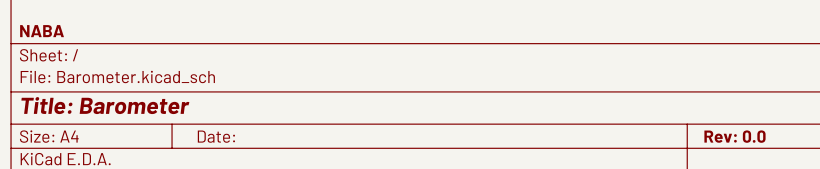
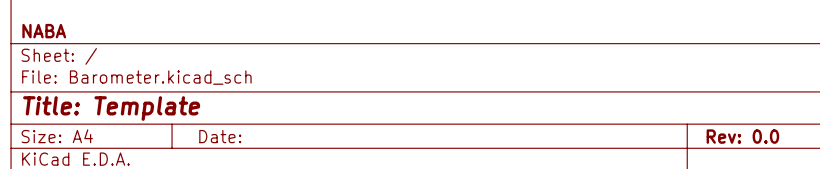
title block: Title: Barometer (105, 105) -> Title: Template (111, 108)

